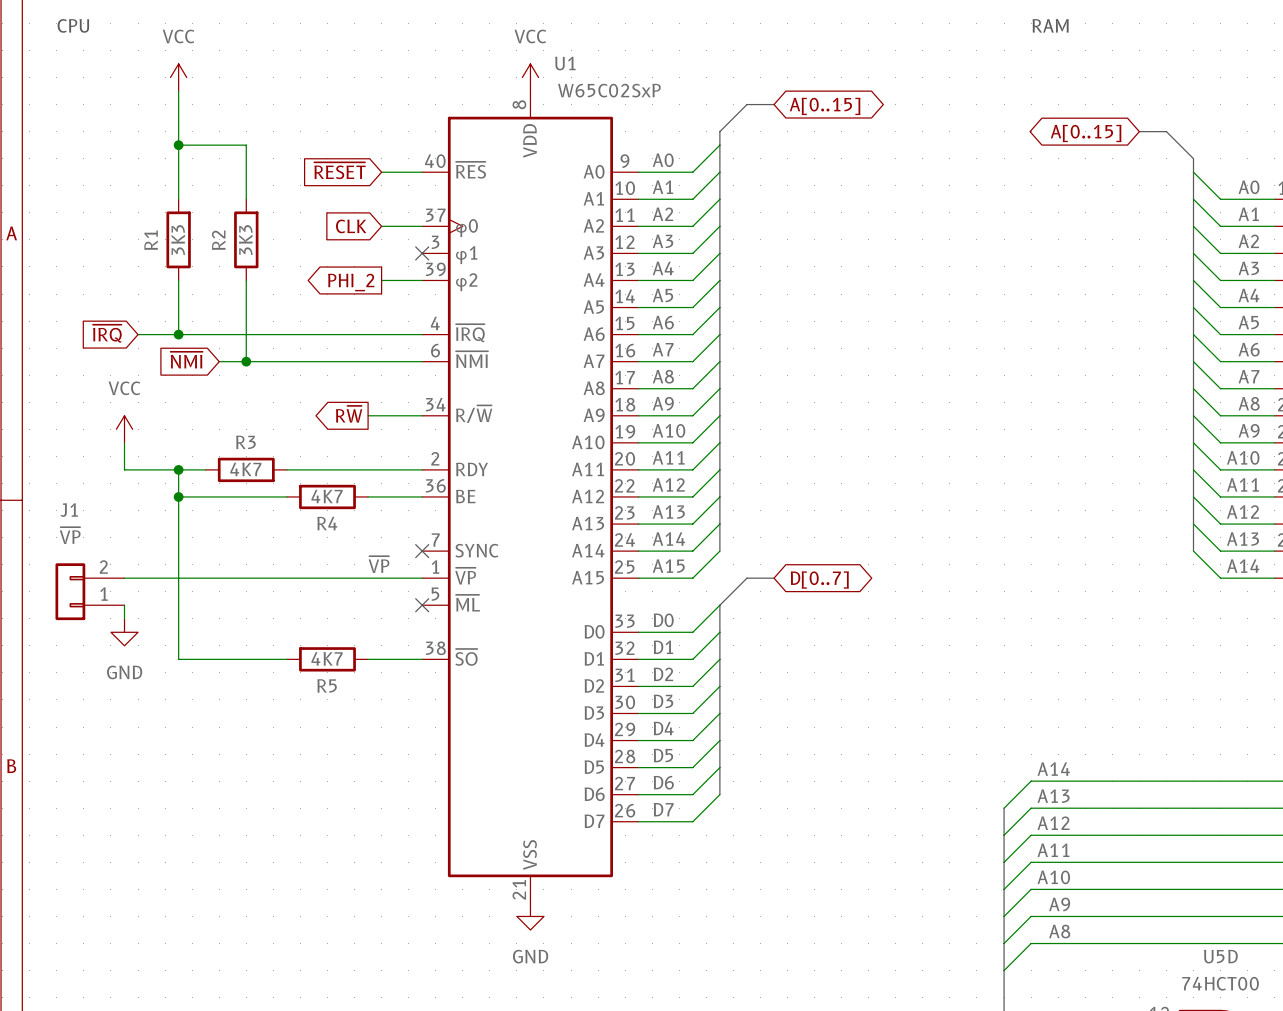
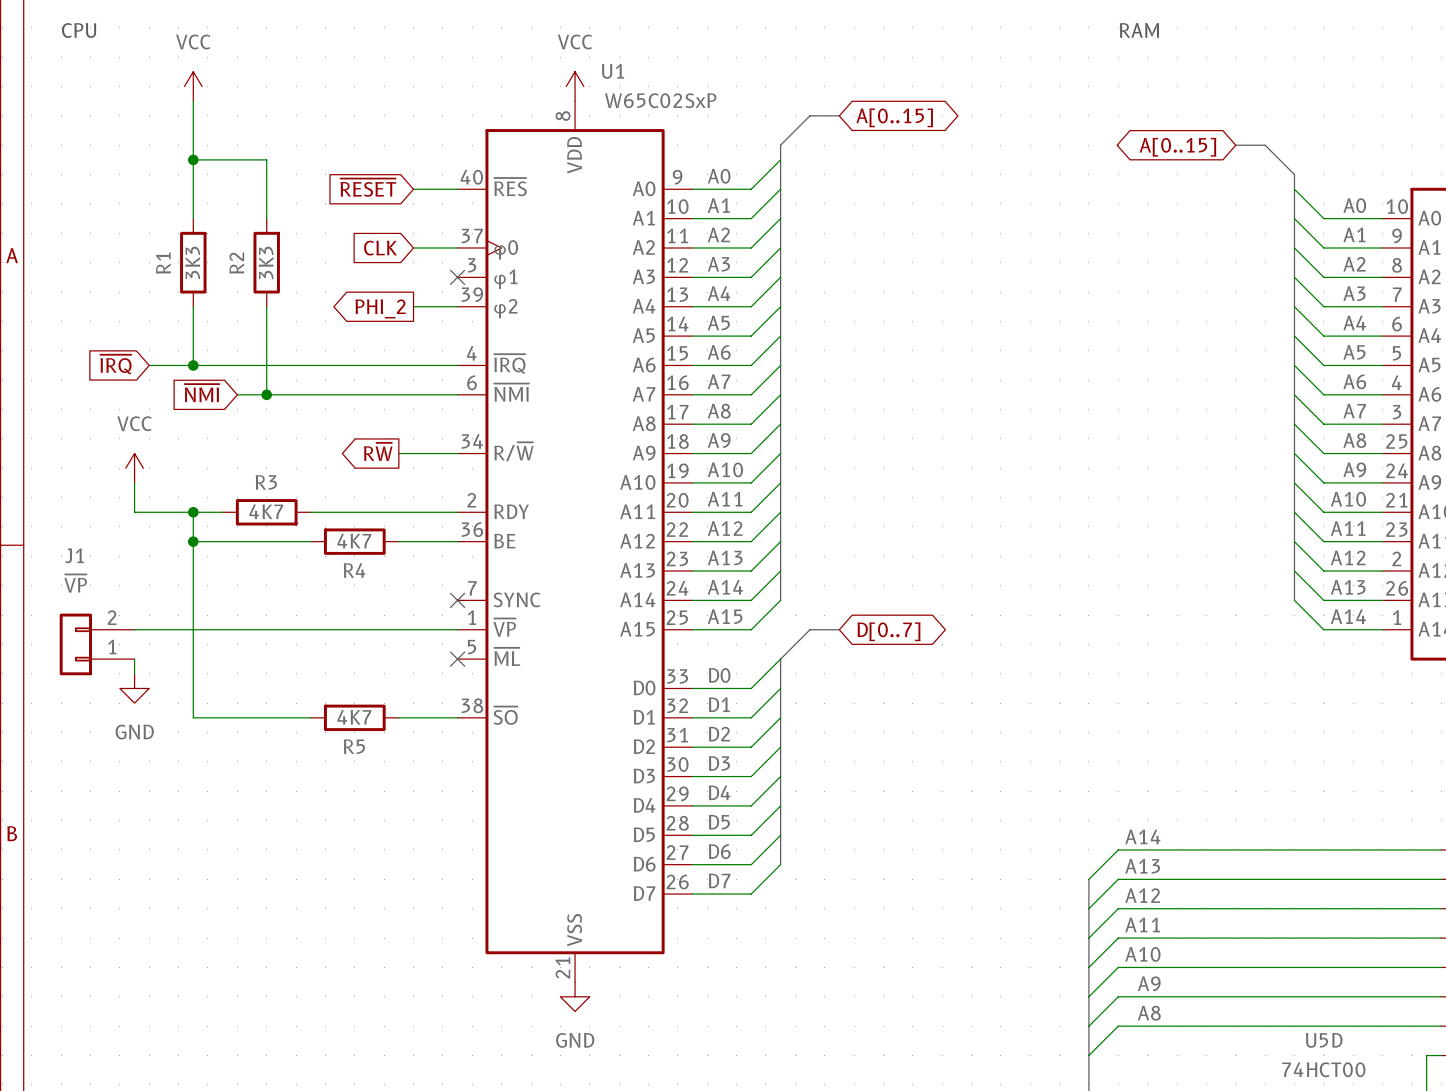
label: ~{VP} (379, 564) -> none

